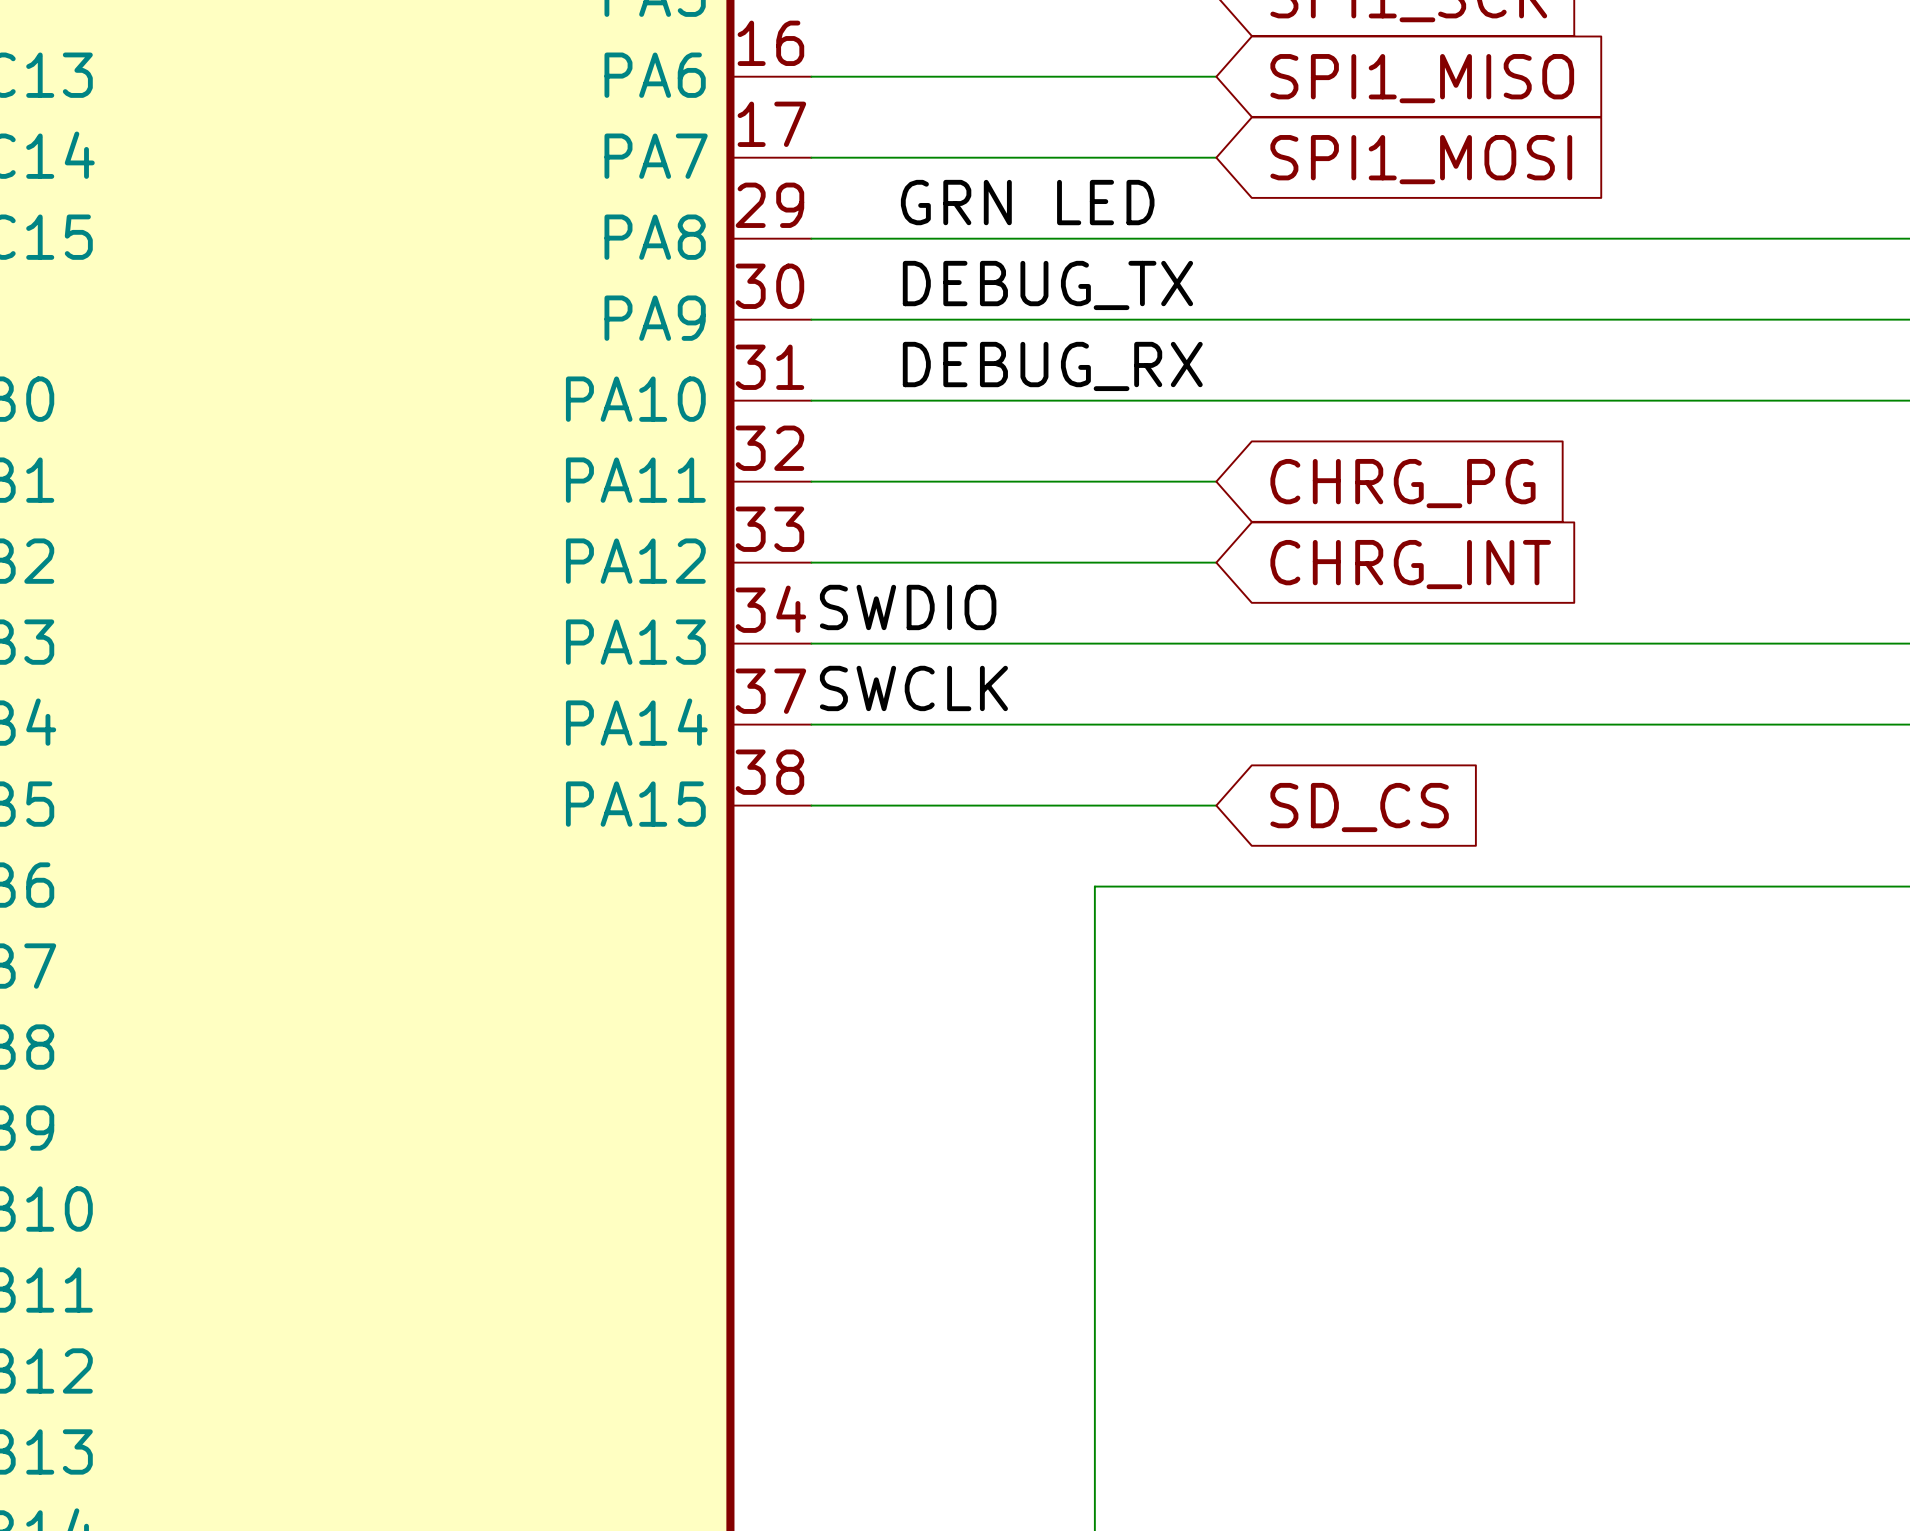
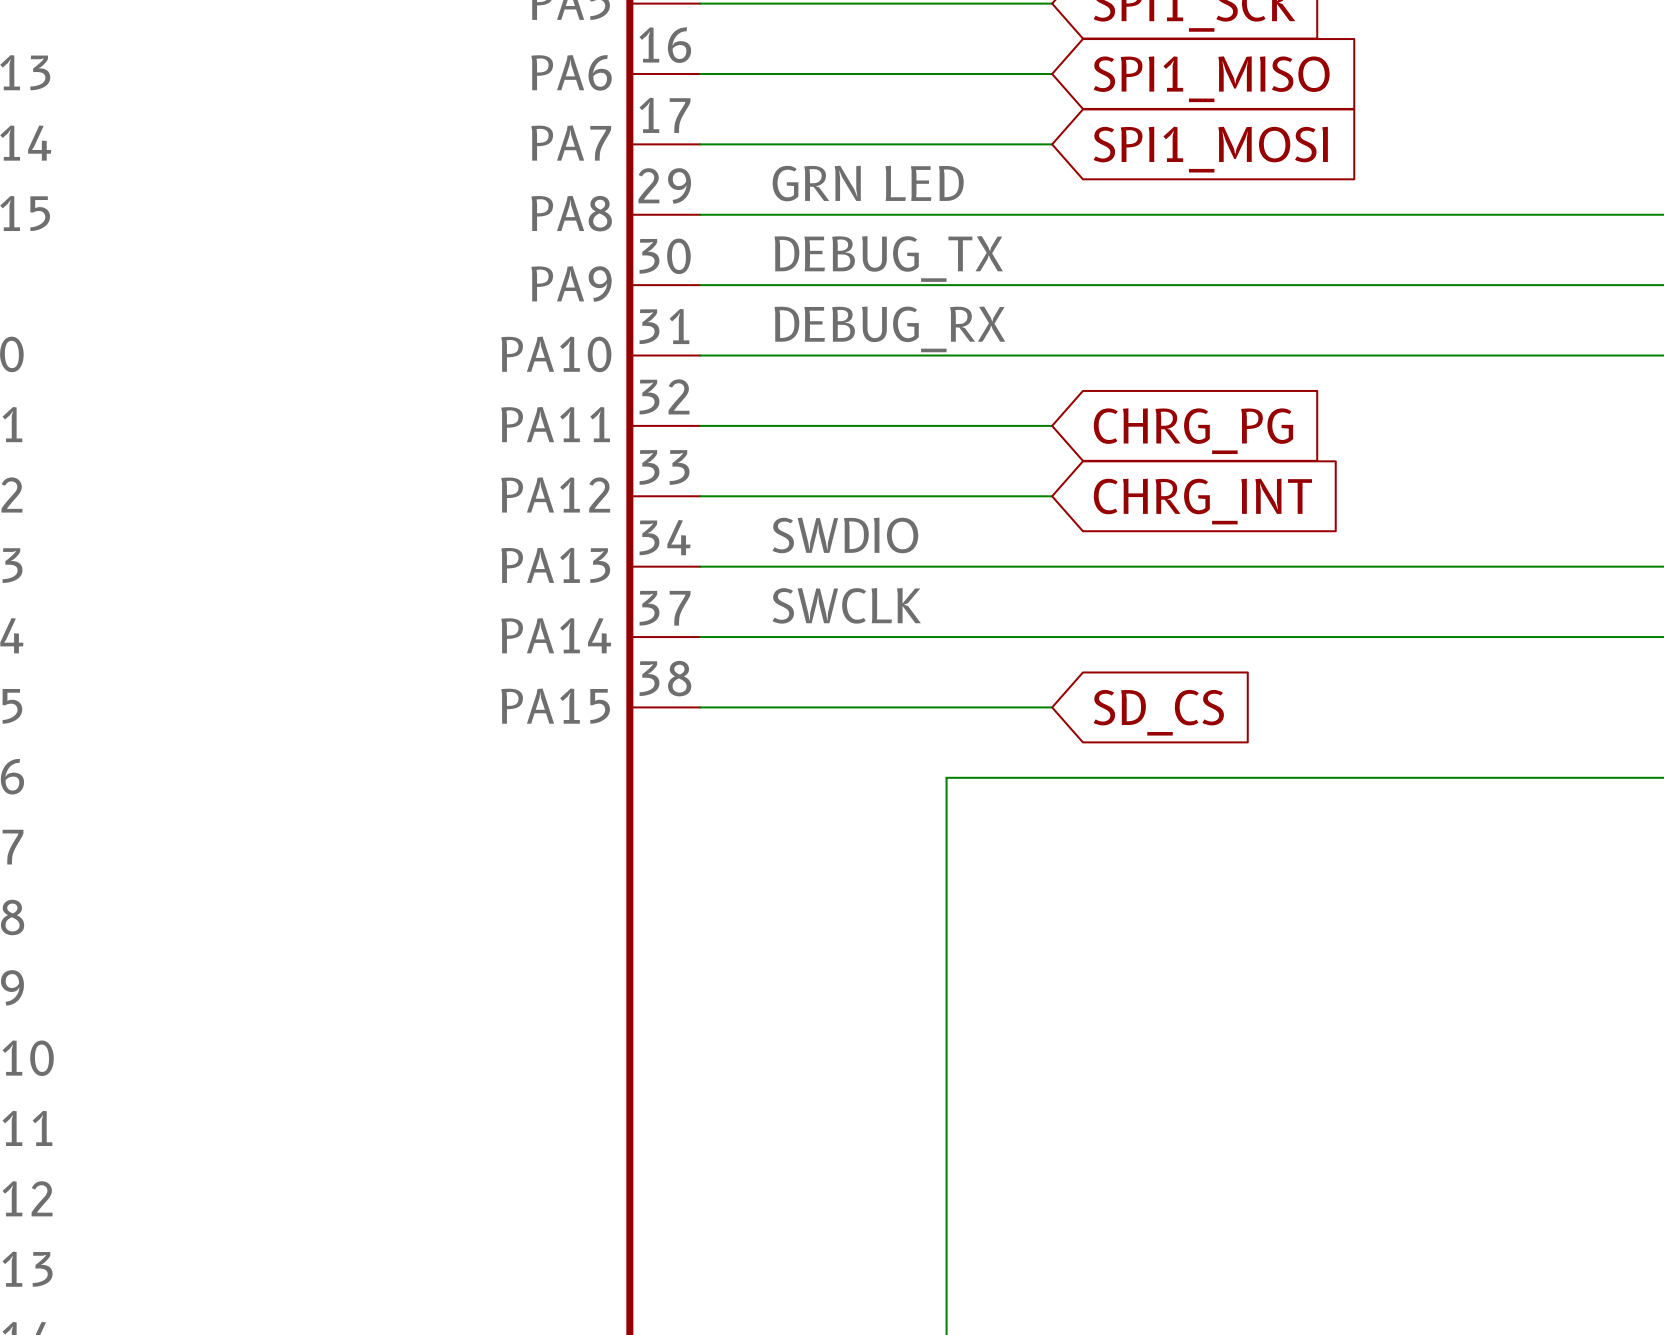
label position: SWDIO (908, 607) -> SWDIO (845, 535)
label position: SWCLK (913, 688) -> SWCLK (846, 605)

